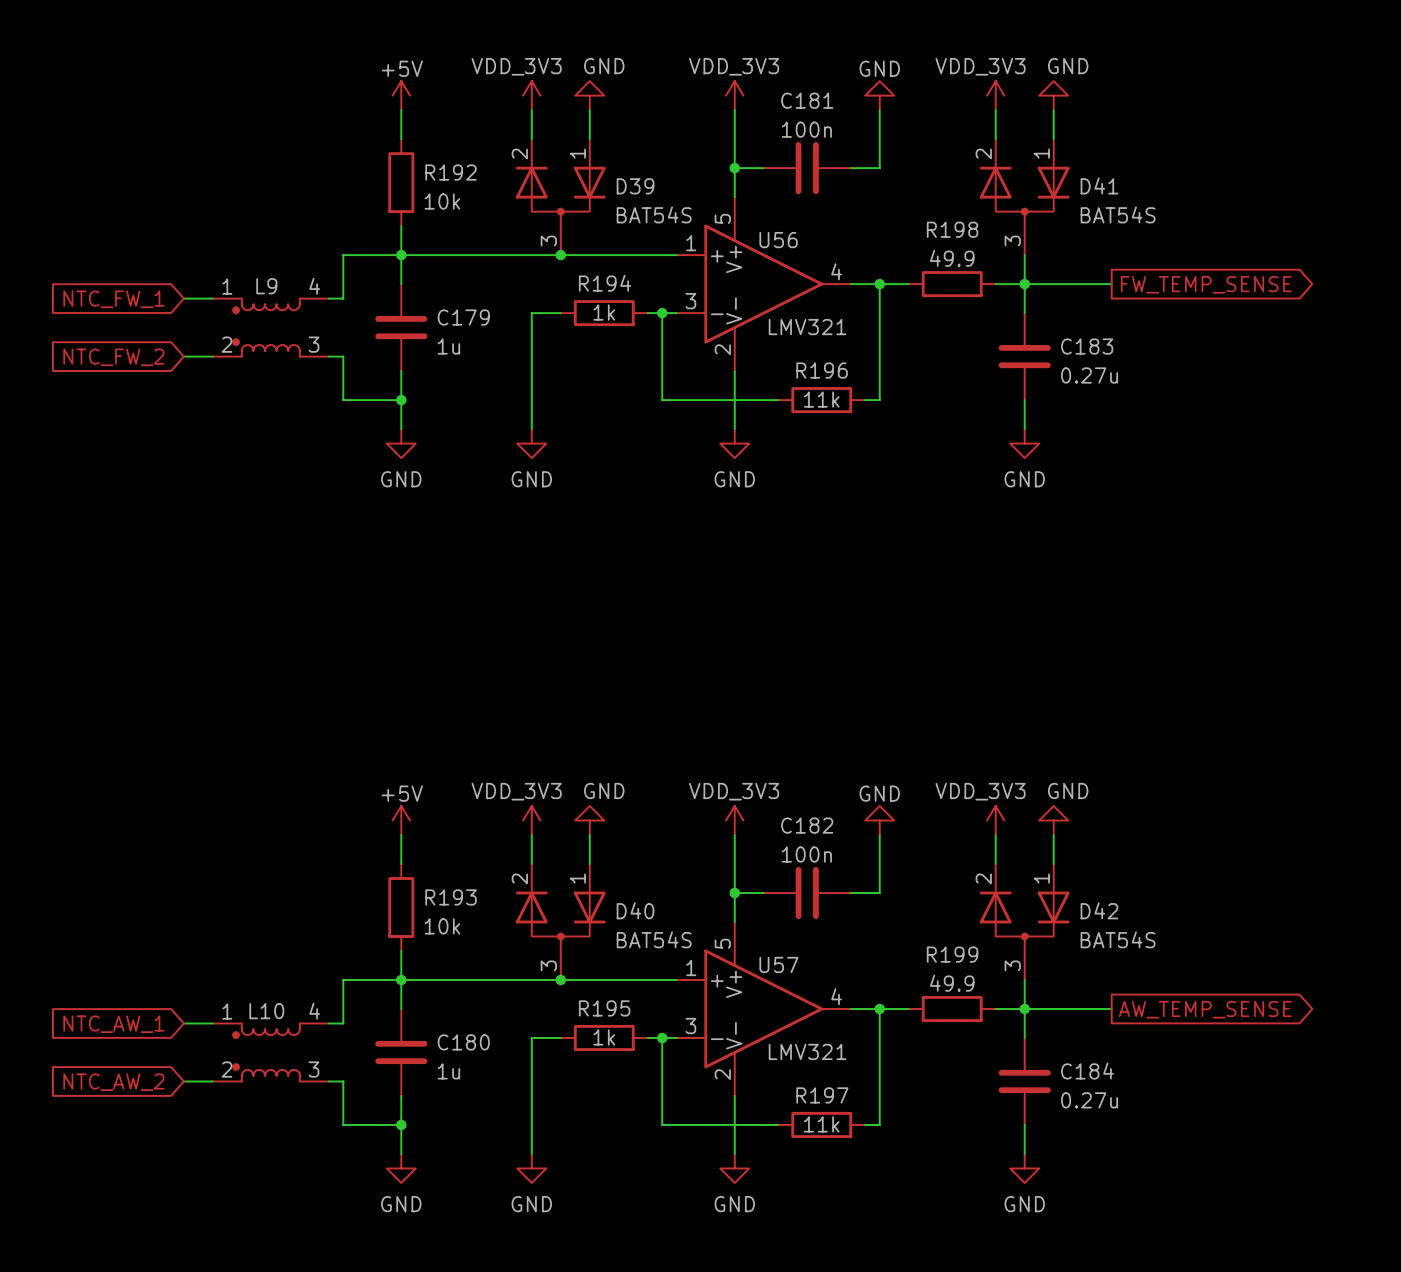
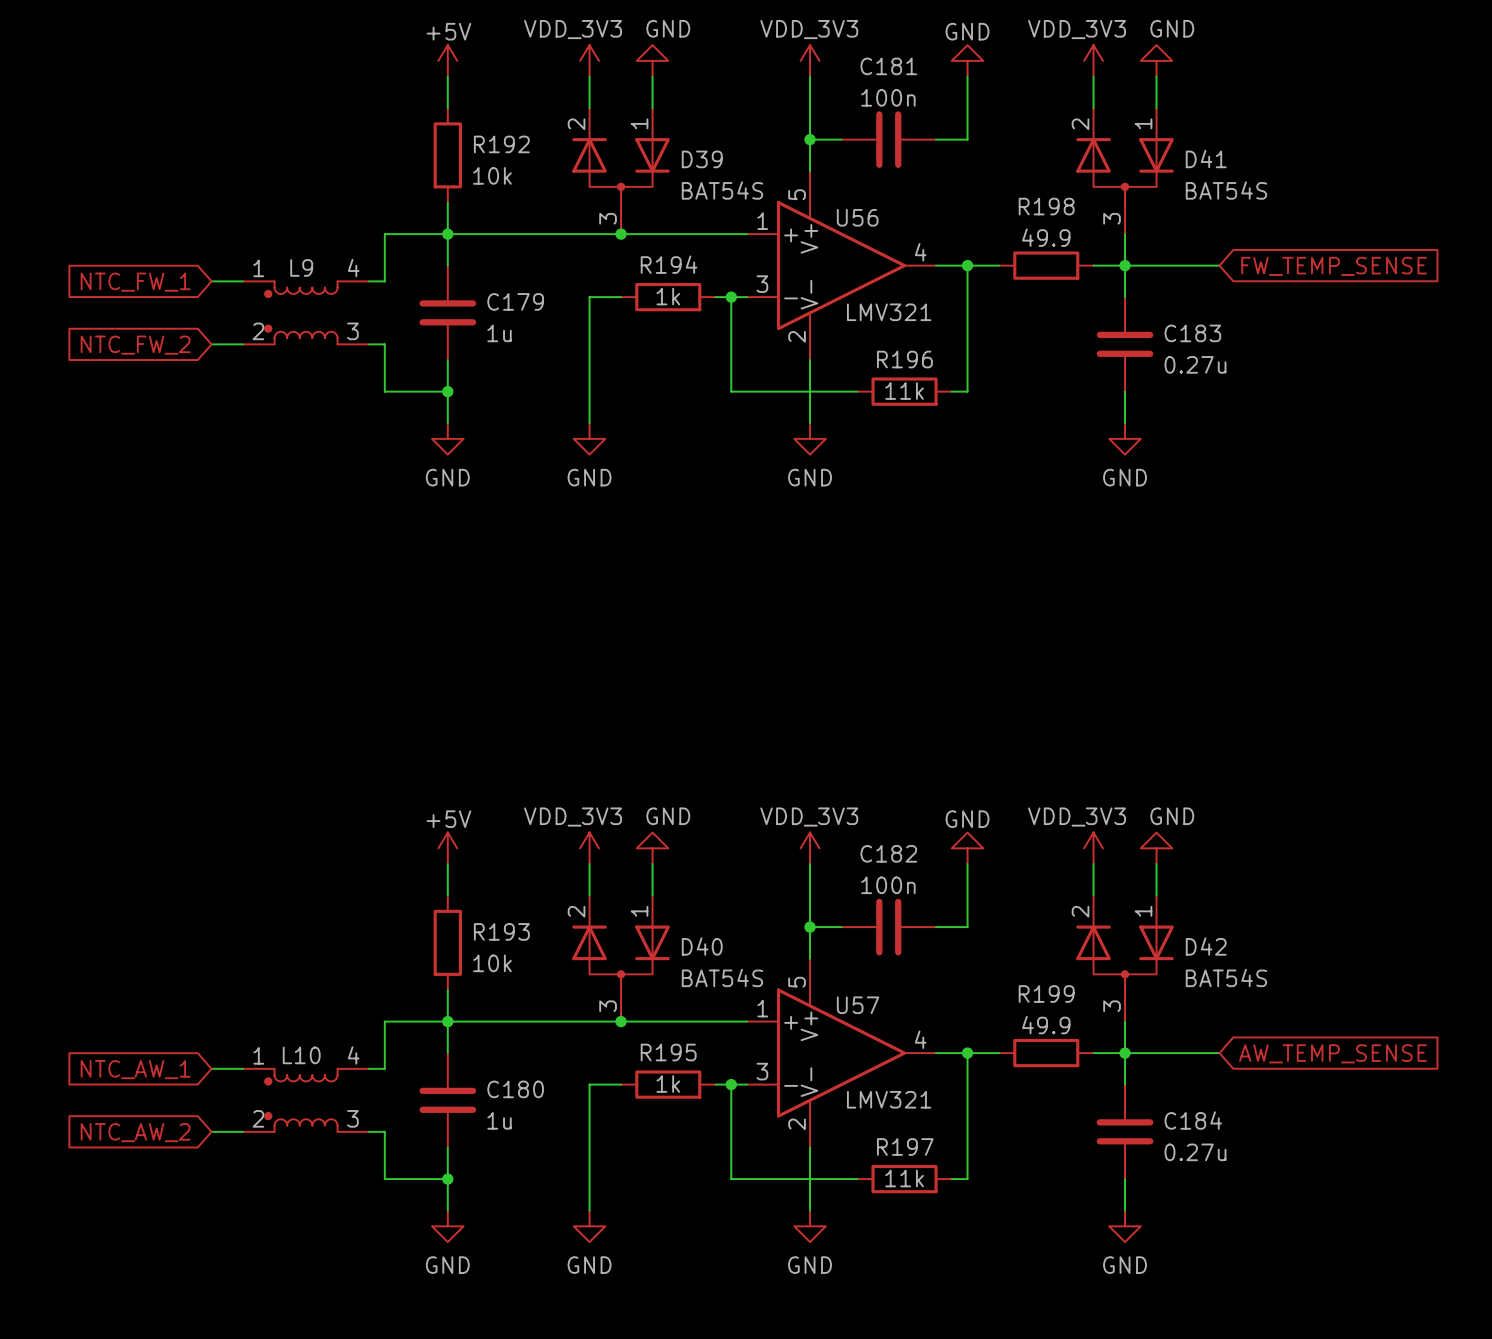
global label shape: output (1206, 284) -> input (1334, 266)
global label shape: output (1205, 1009) -> input (1332, 1053)

